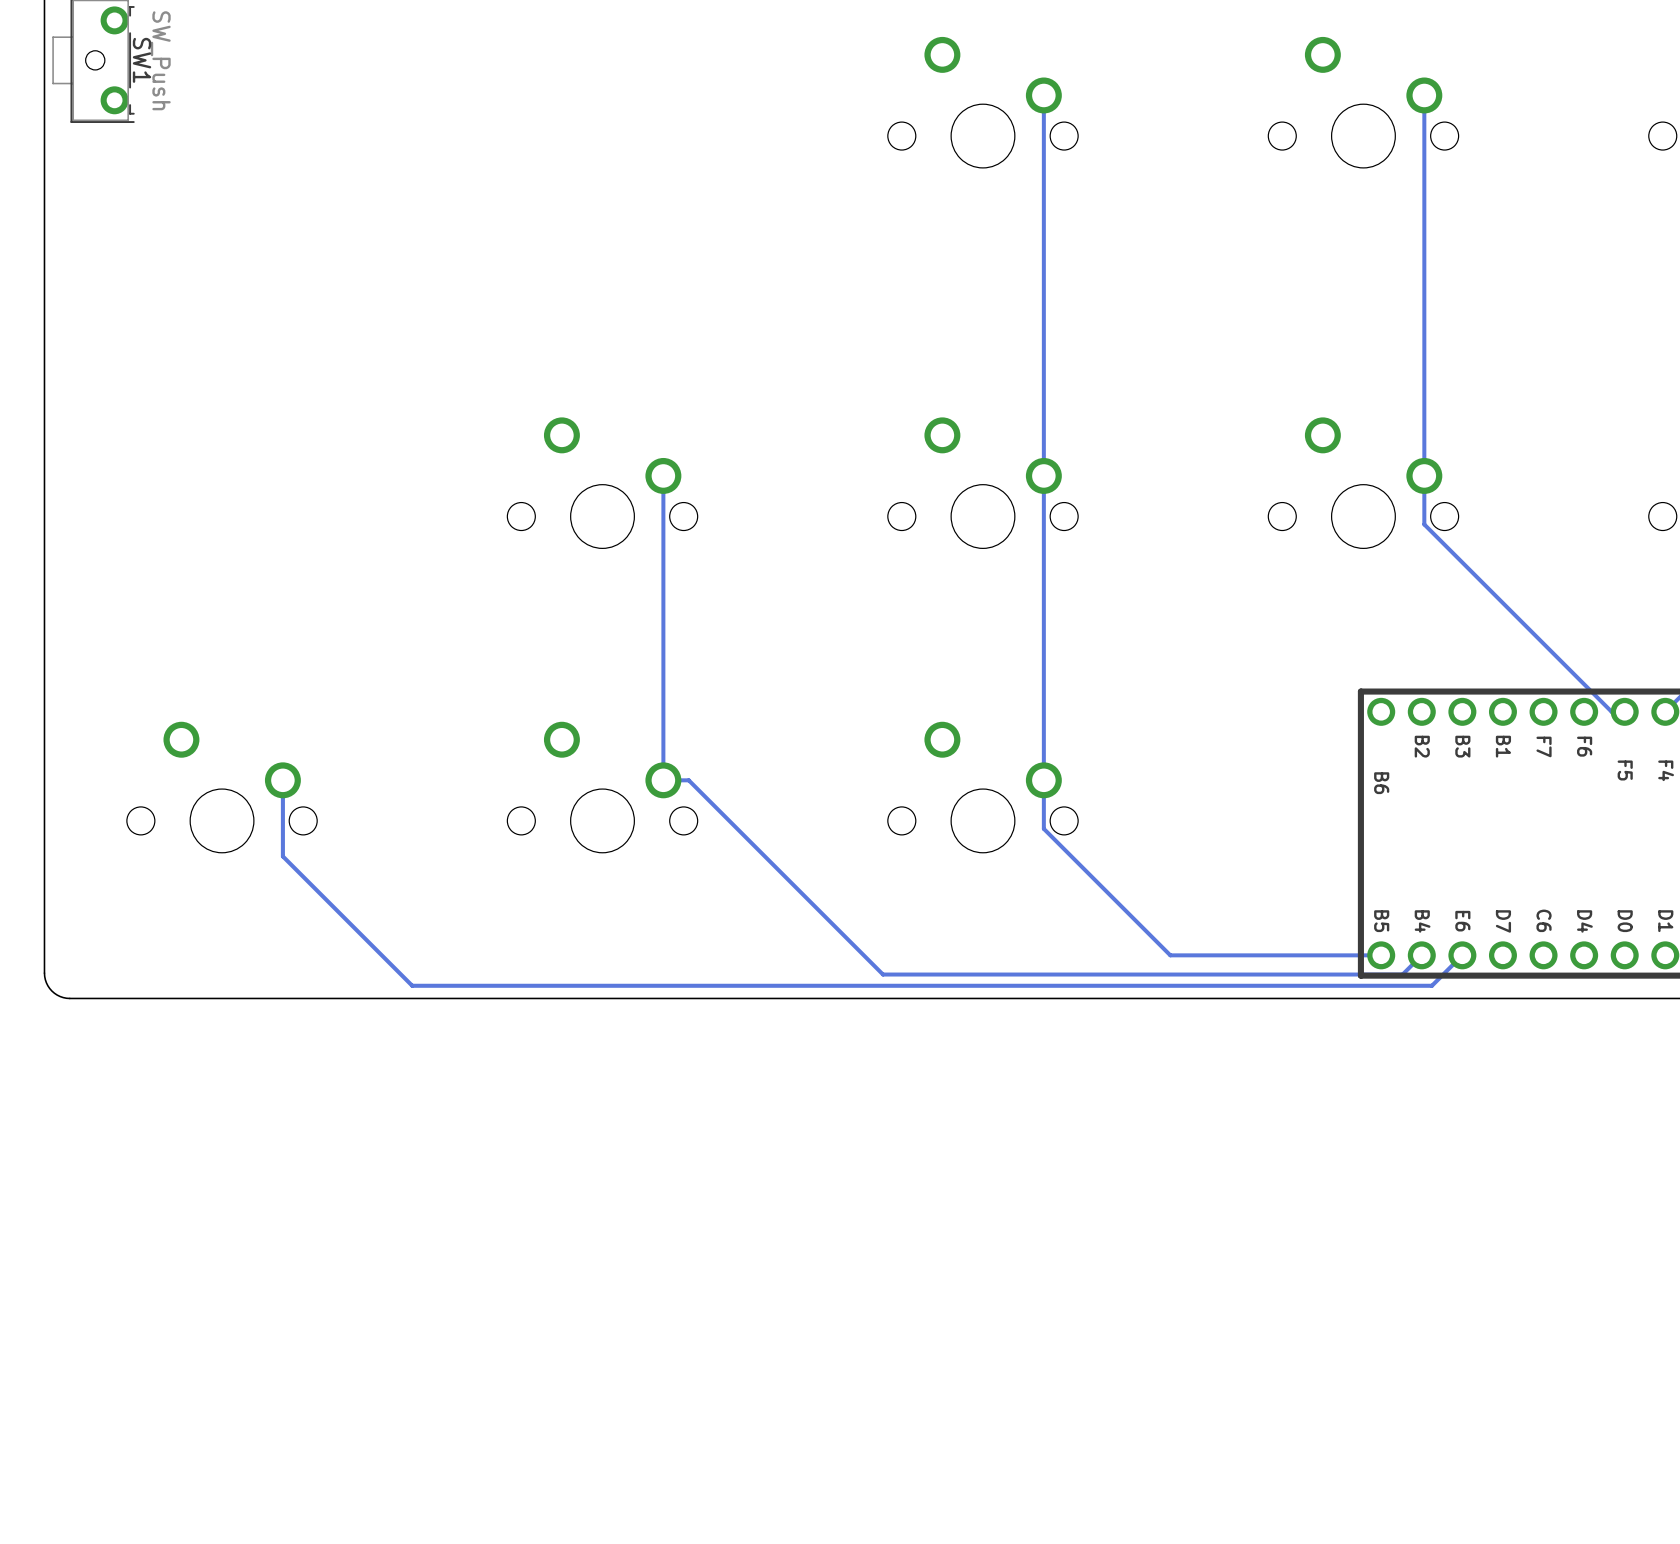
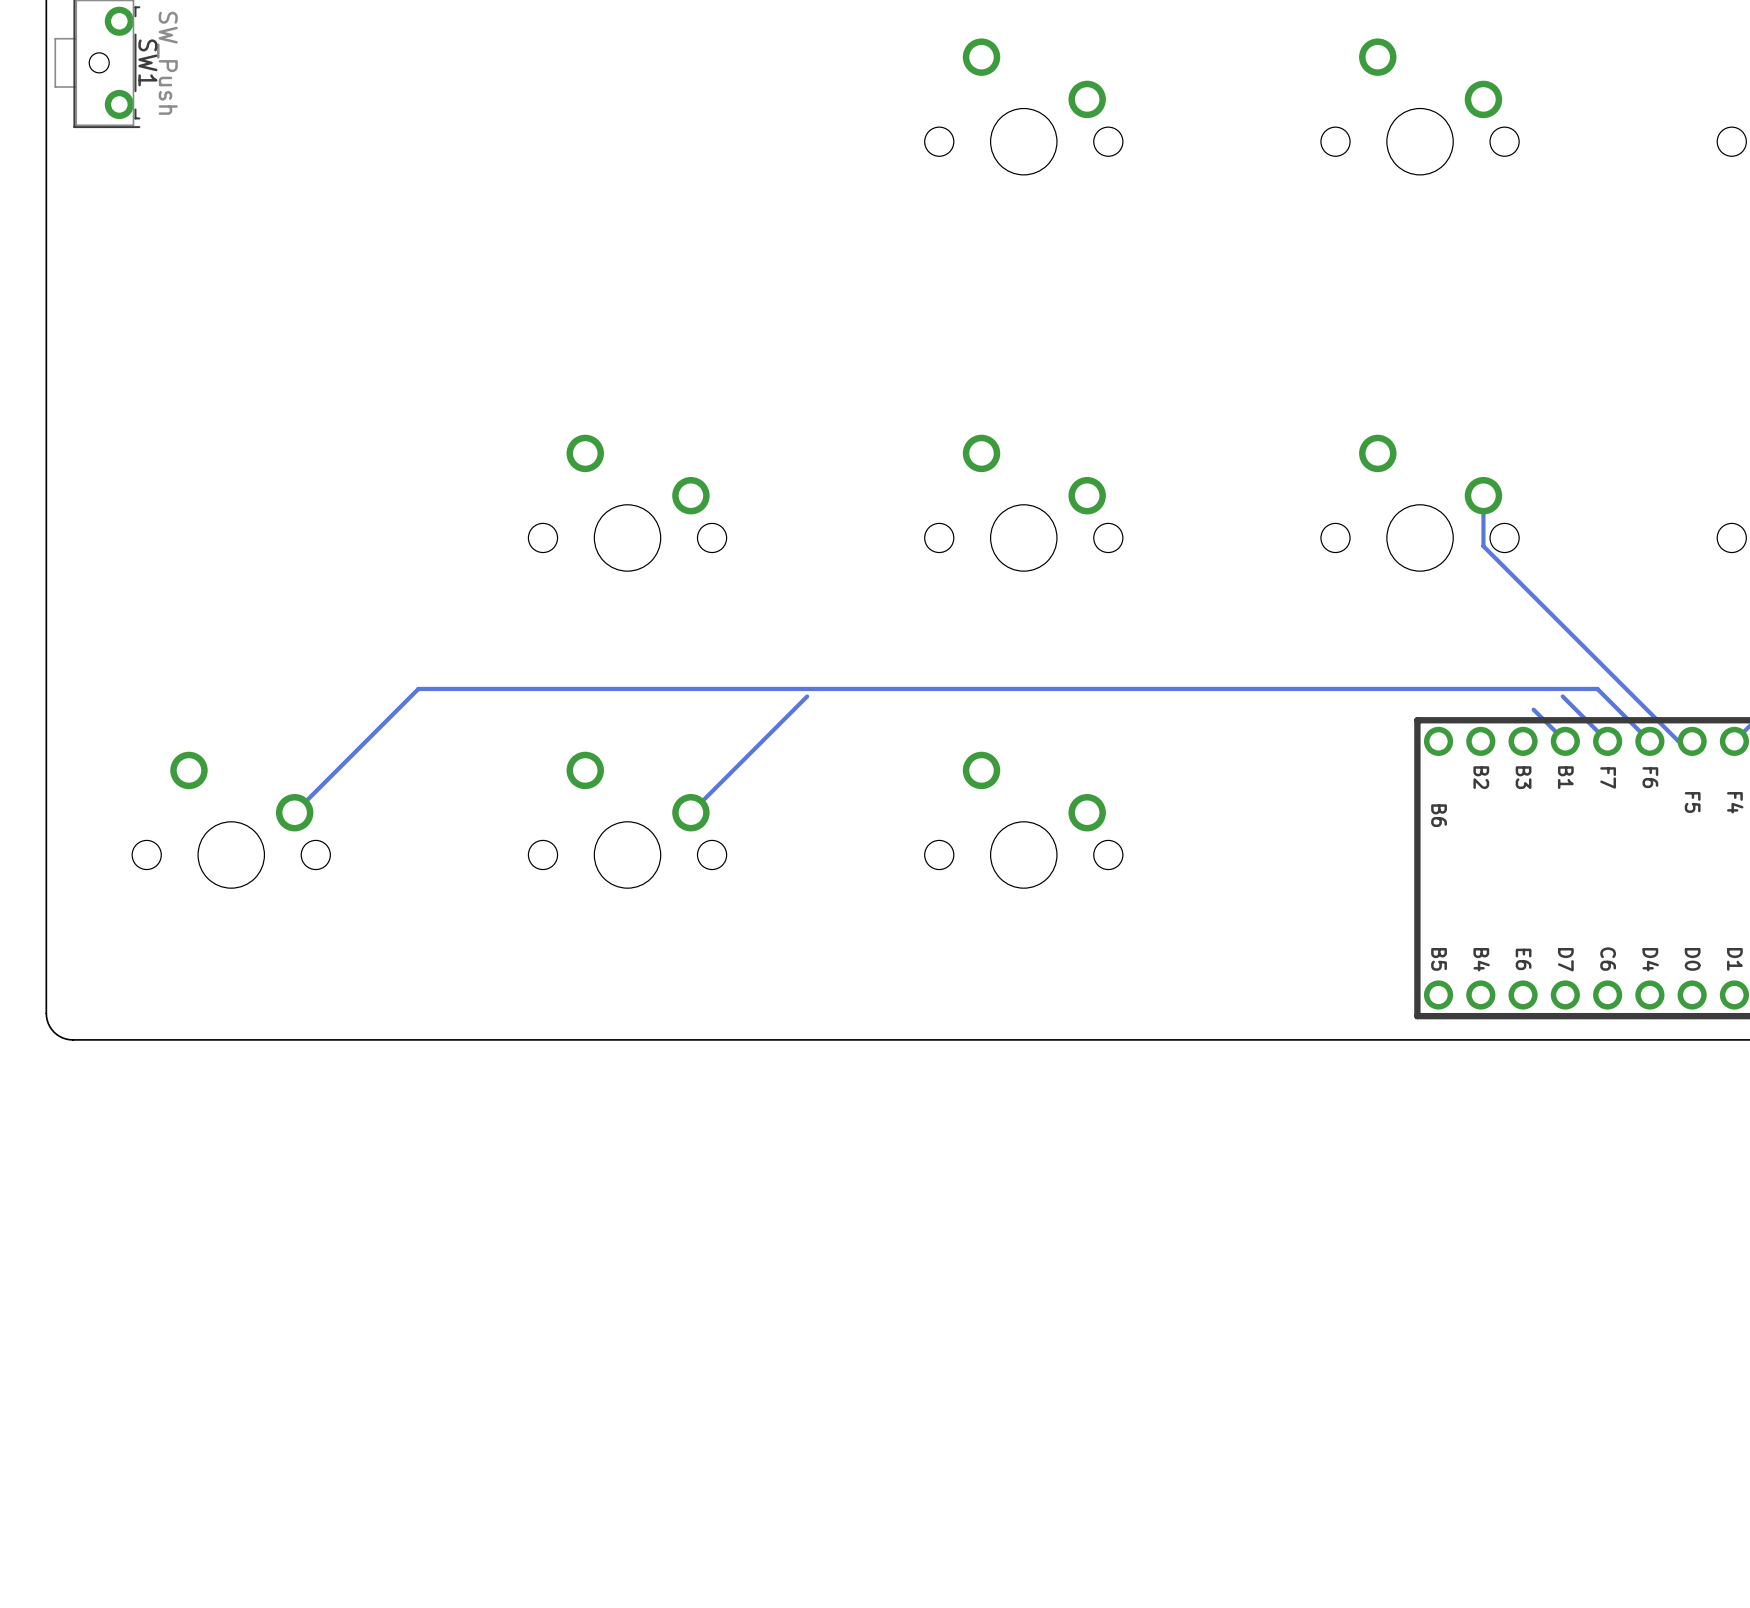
track: (1043, 95) (1043, 828) (1170, 955) (1381, 955) -> none
track: (1424, 95) (1424, 475) -> none
track: (663, 475) (663, 780) (688, 780) (883, 974) (1402, 974) (1421, 955) -> none
track: none -> (807, 696) (690, 812)
track: none -> (1562, 696) (1607, 741)
track: none -> (1533, 709) (1565, 741)
track: (282, 780) (282, 856) (412, 985) (1431, 985) (1462, 955) -> (294, 812) (418, 688) (1597, 688) (1649, 741)

